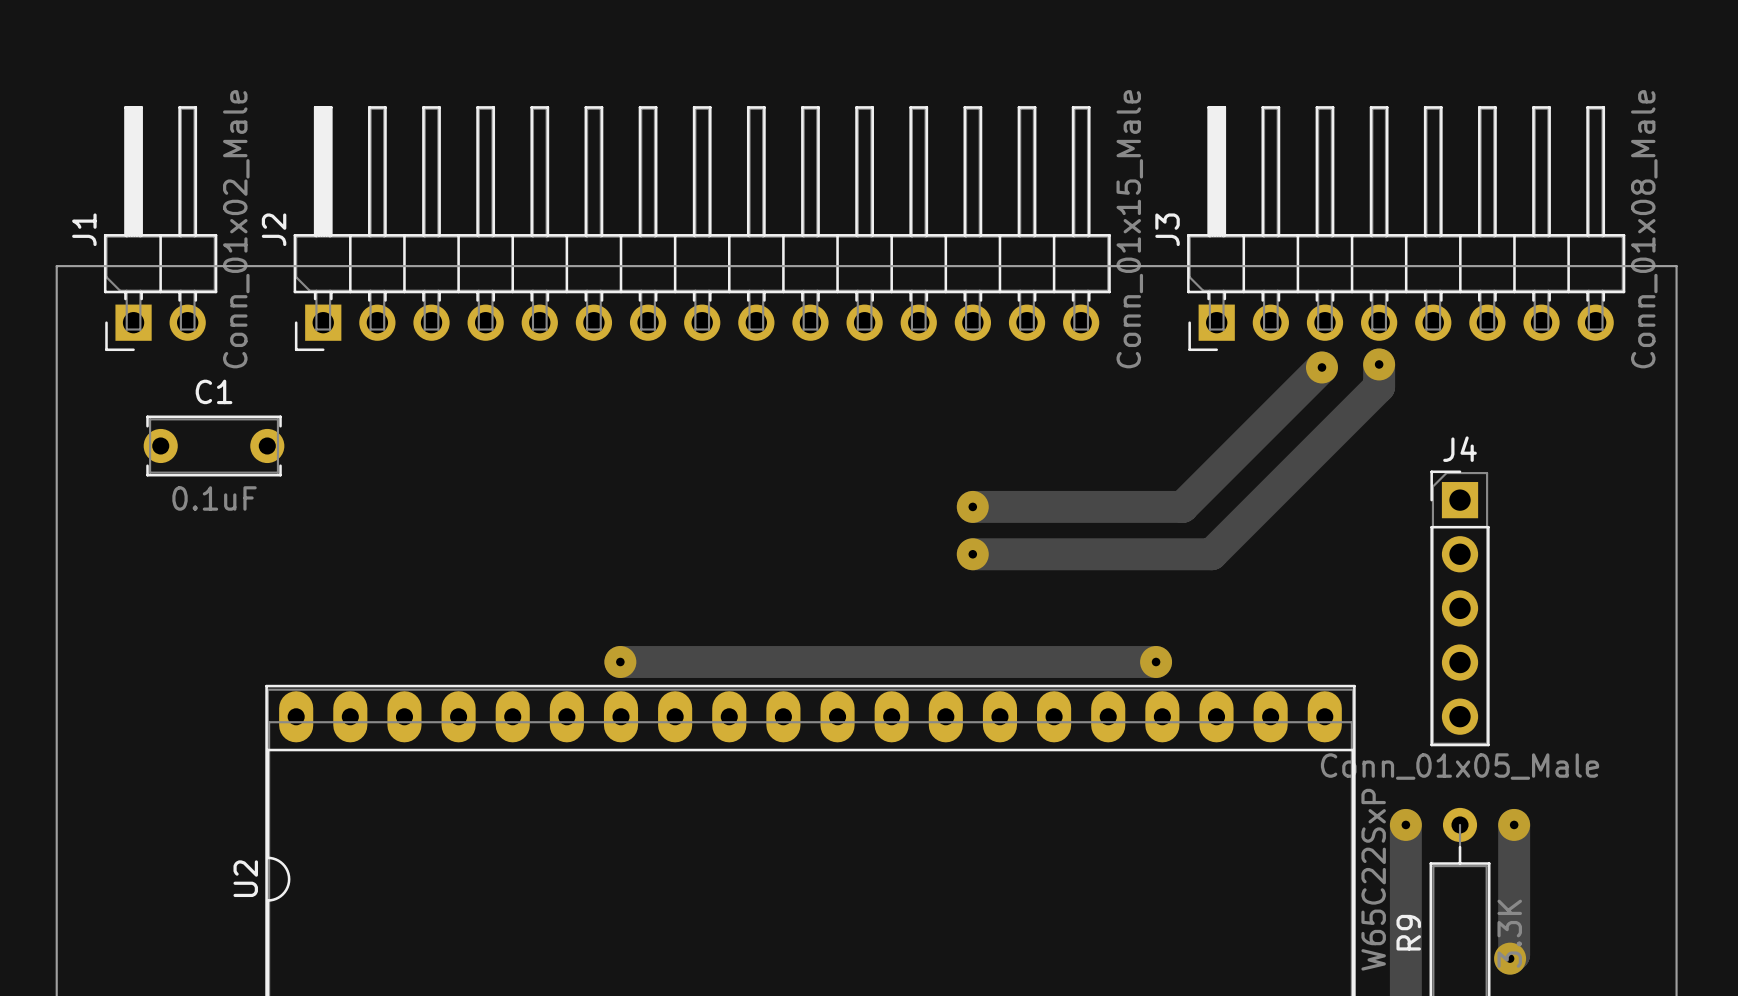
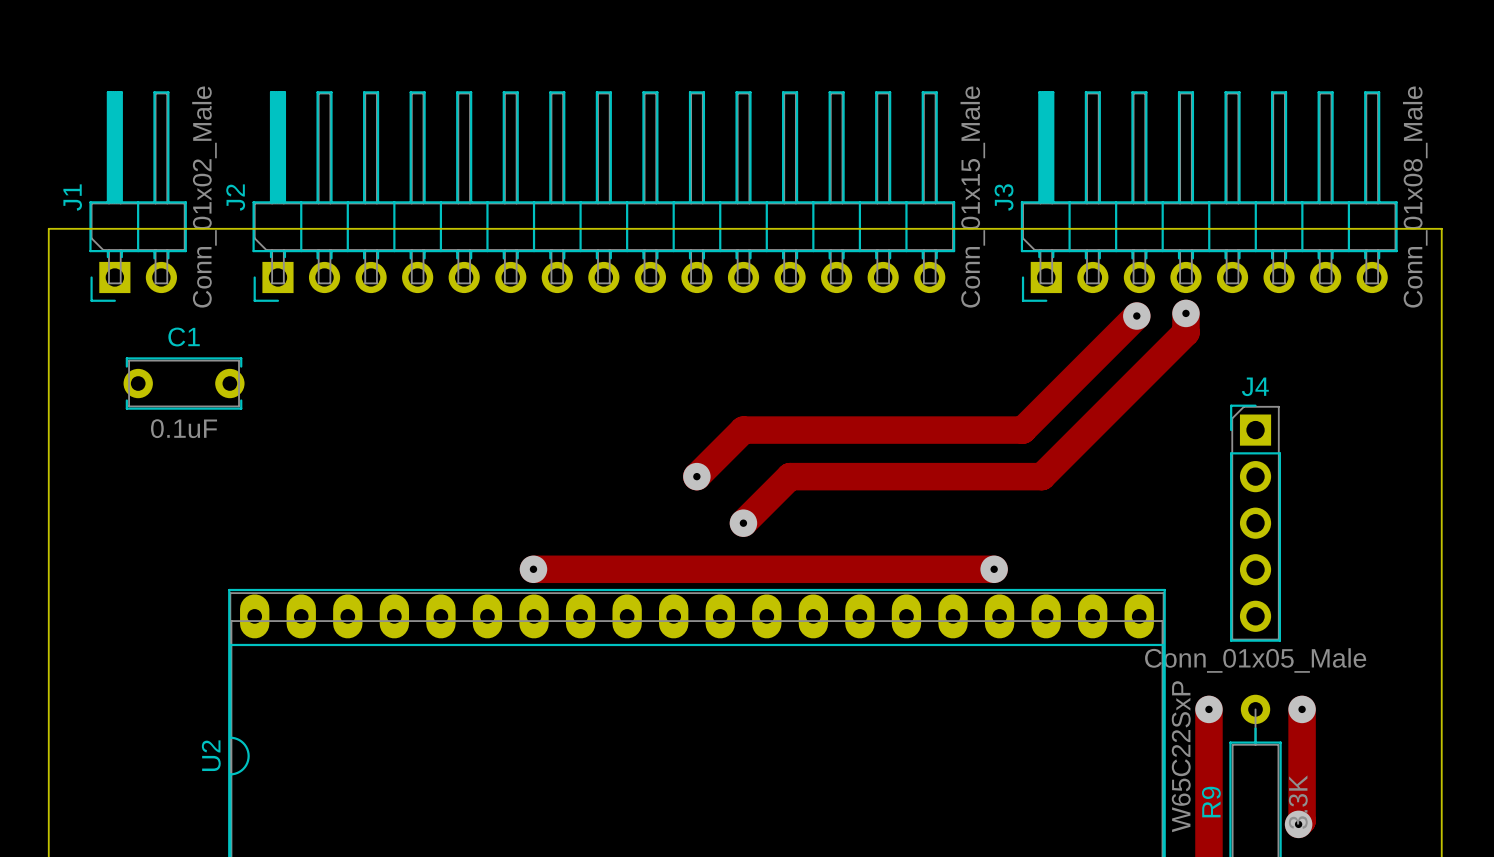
track: (1189, 500) (1182, 506) (972, 506) -> (1022, 430) (743, 430) (696, 476)
via: (972, 506) -> none
via: none -> (696, 476)
track: none -> (836, 476) (789, 476) (743, 523)
via: (972, 554) -> none
via: none -> (743, 523)

